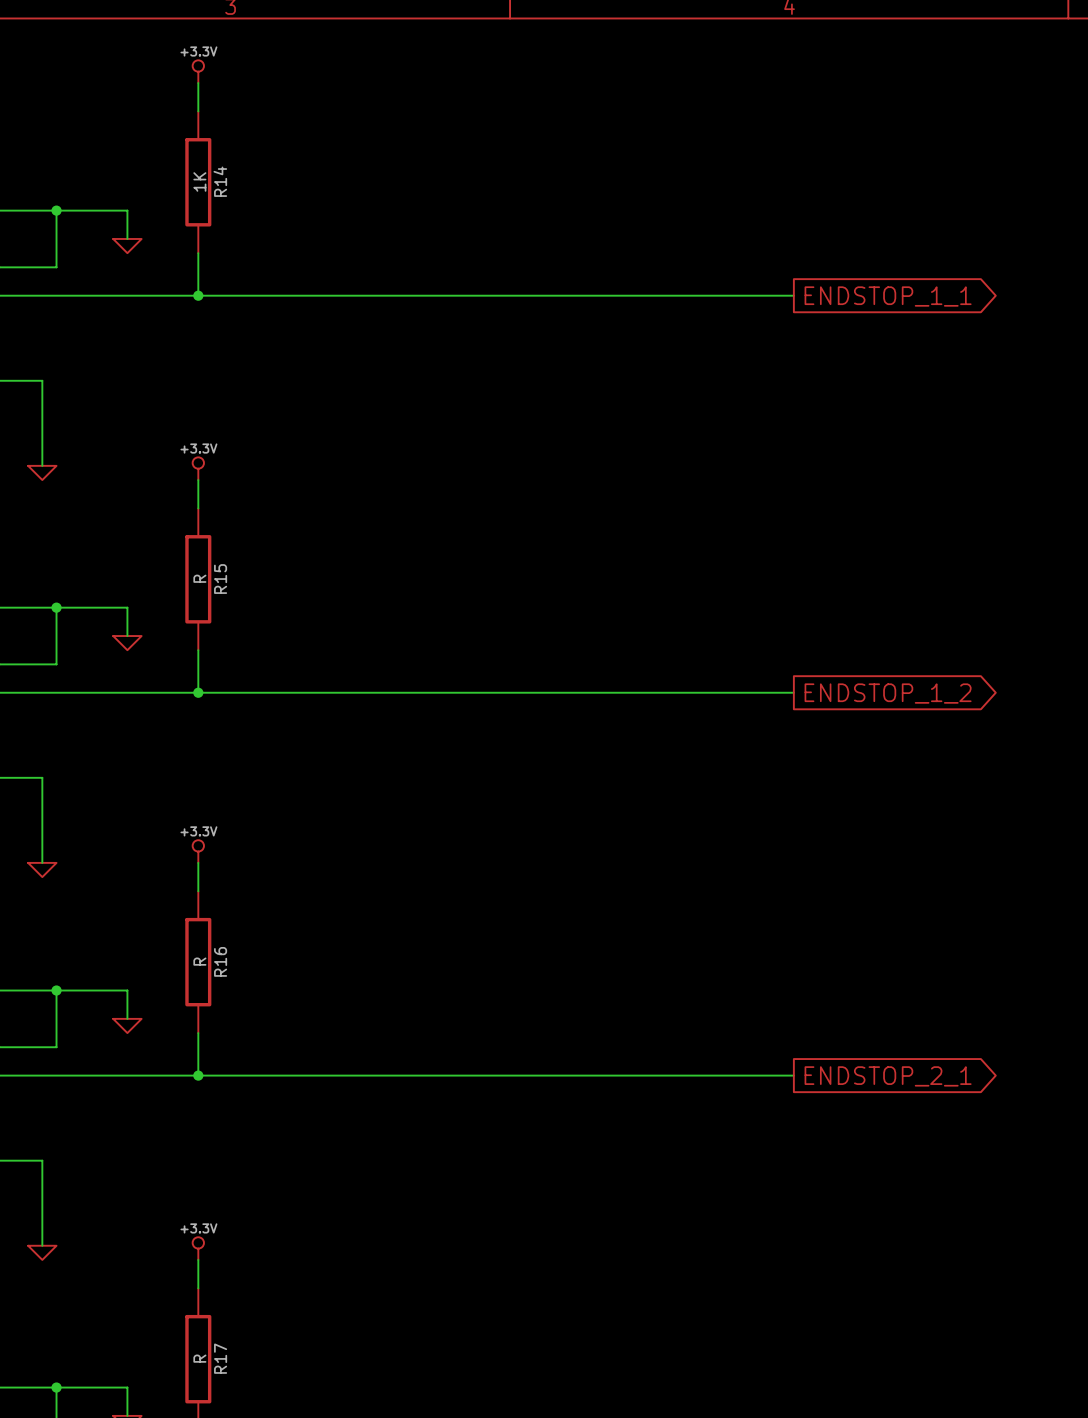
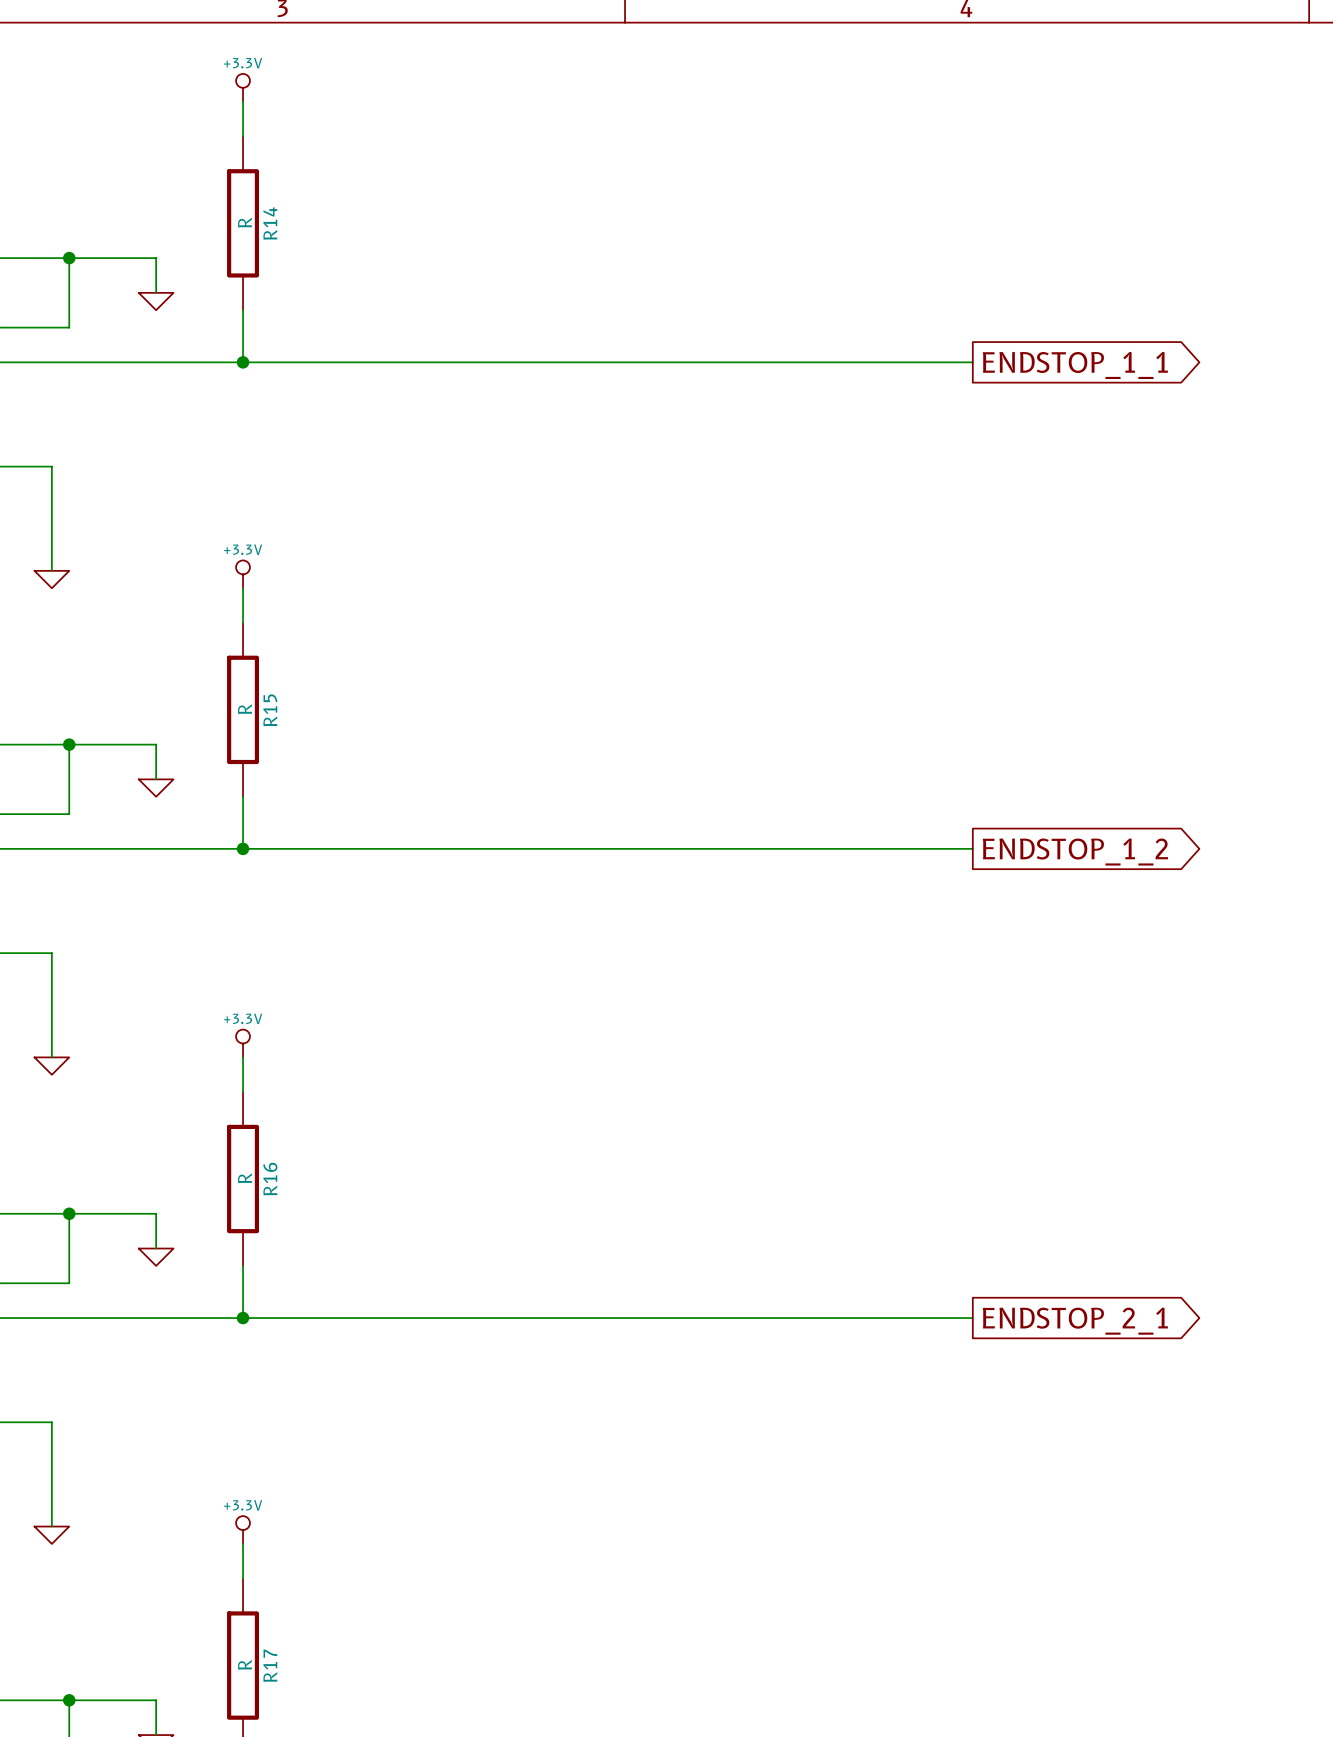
R14 value: 1K (199, 181) -> R (244, 222)

